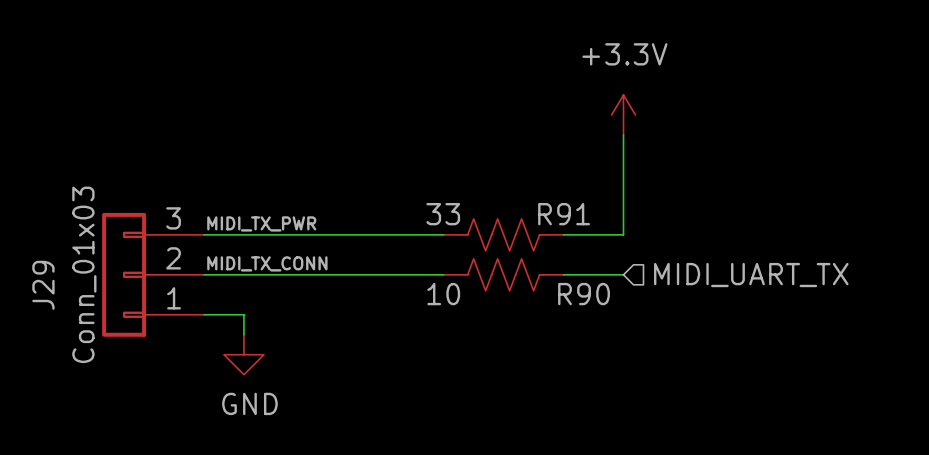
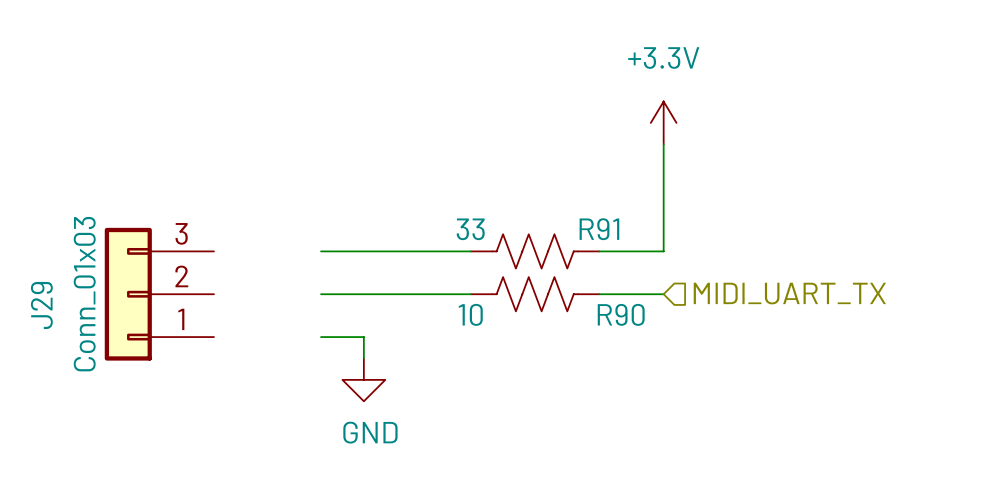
label: MIDI_TX_PWR (261, 223) -> none
wire: (204, 234) (303, 234) -> none
label: MIDI_TX_CONN (267, 263) -> none
wire: (204, 274) (303, 274) -> none
wire: (204, 314) (243, 314) (243, 334) -> (321, 337) (363, 337) (363, 358)
power symbol position: GND (243, 354) -> GND (363, 379)

